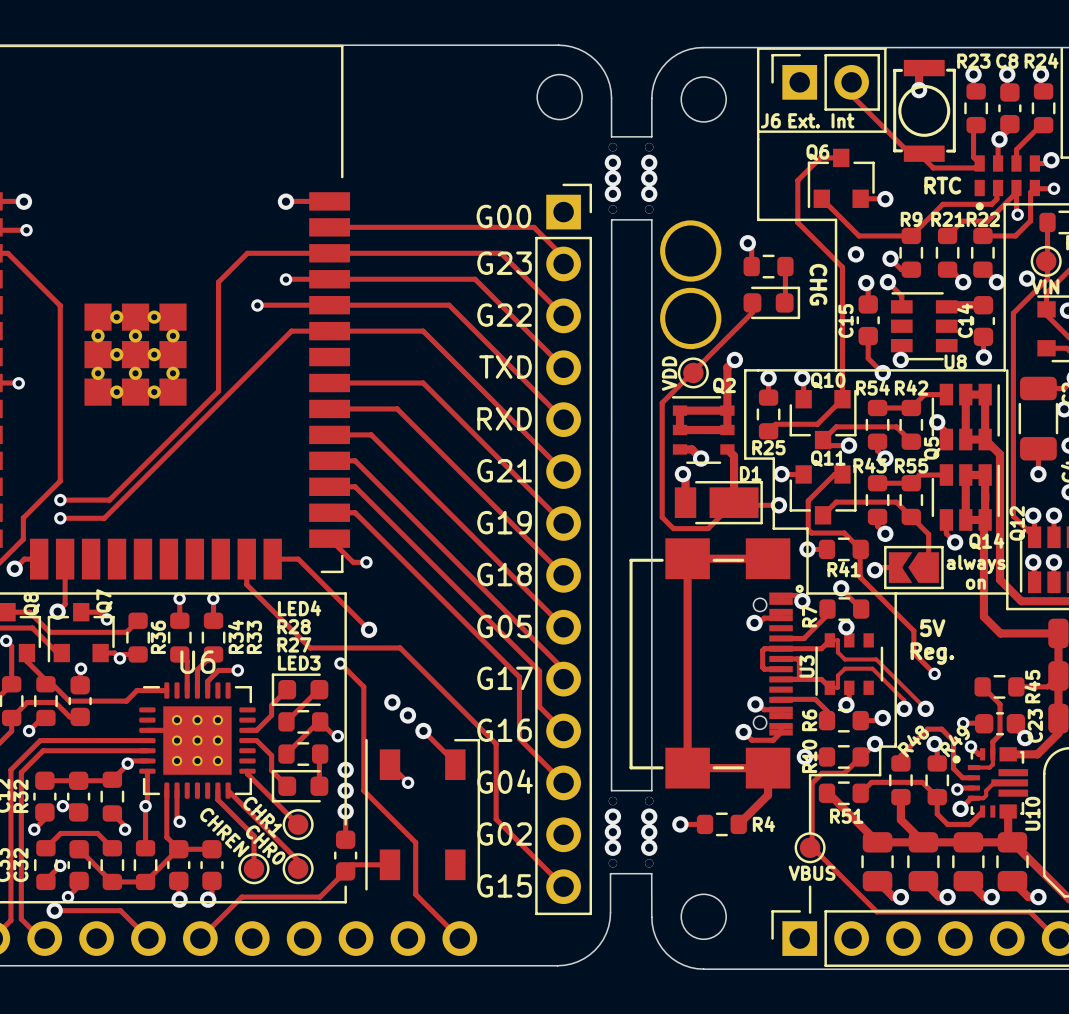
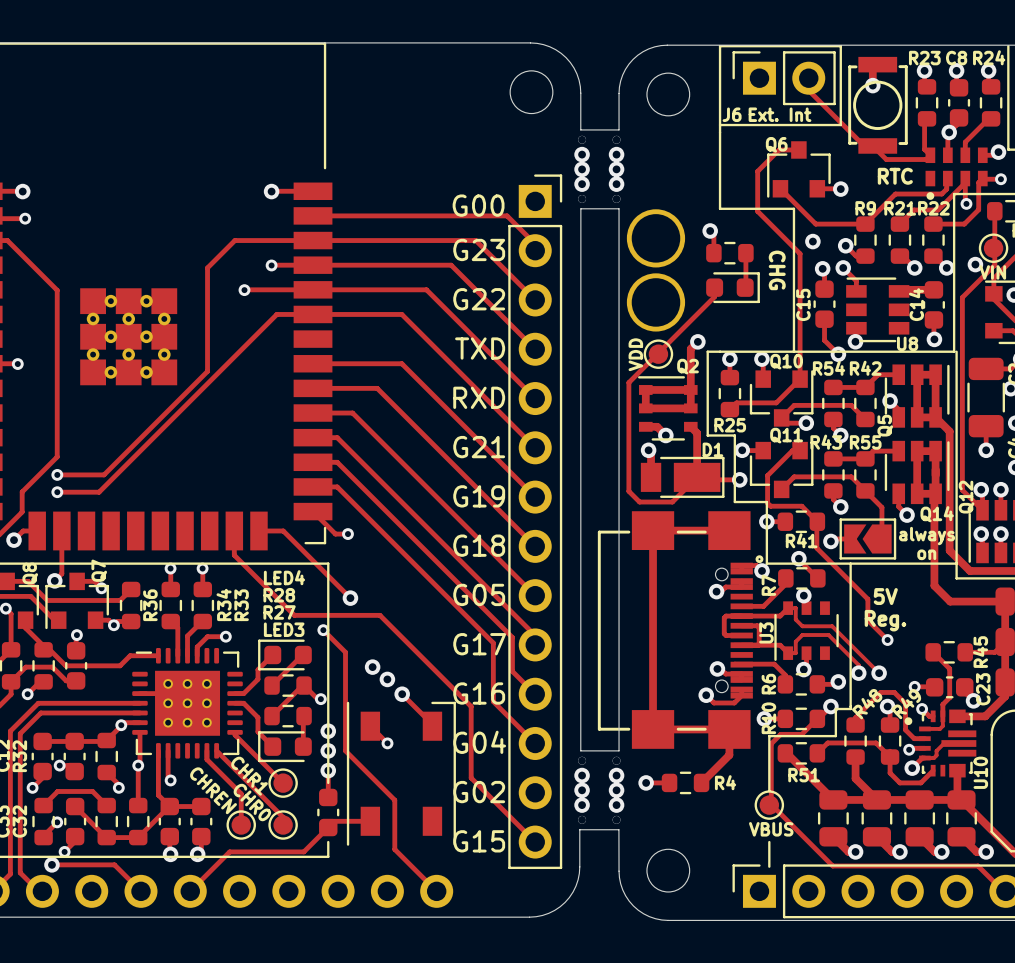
U6 name: U6 (197, 662) -> none

